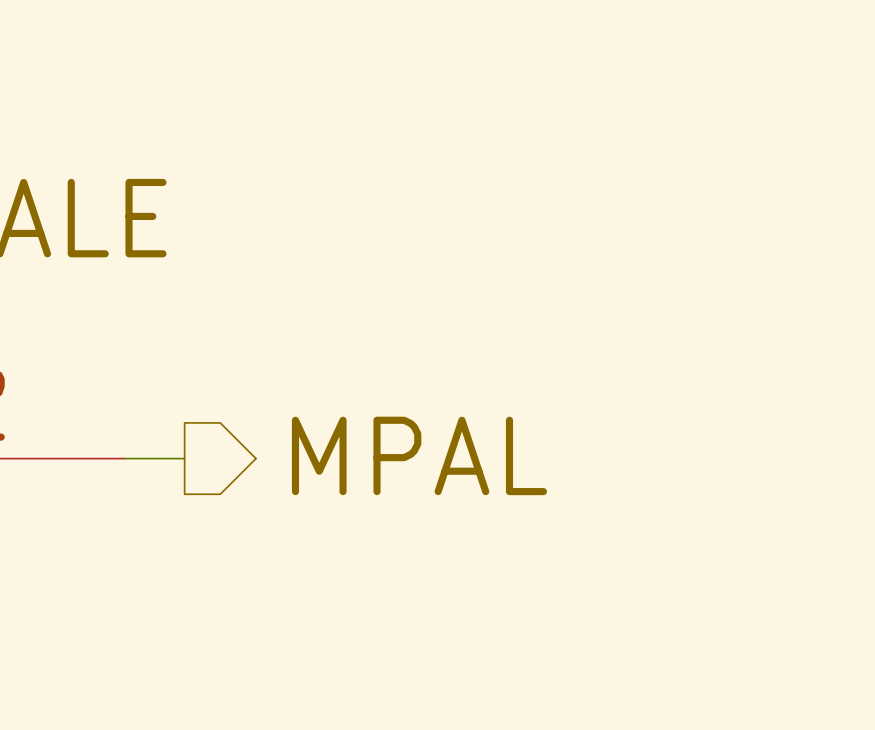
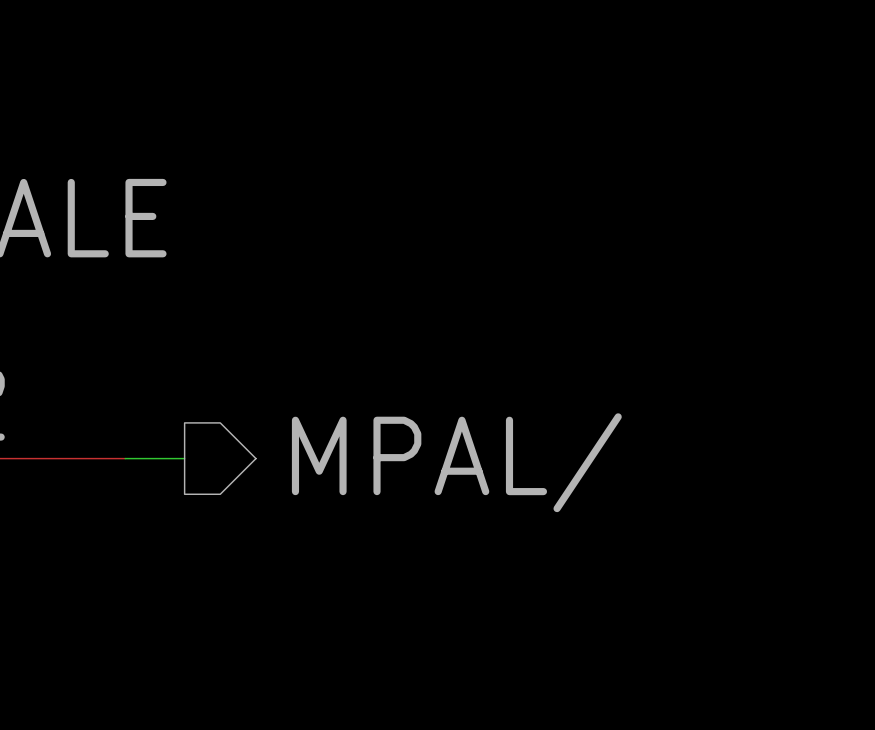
hierarchical label: MPAL (419, 455) -> MPAL/ (456, 462)

